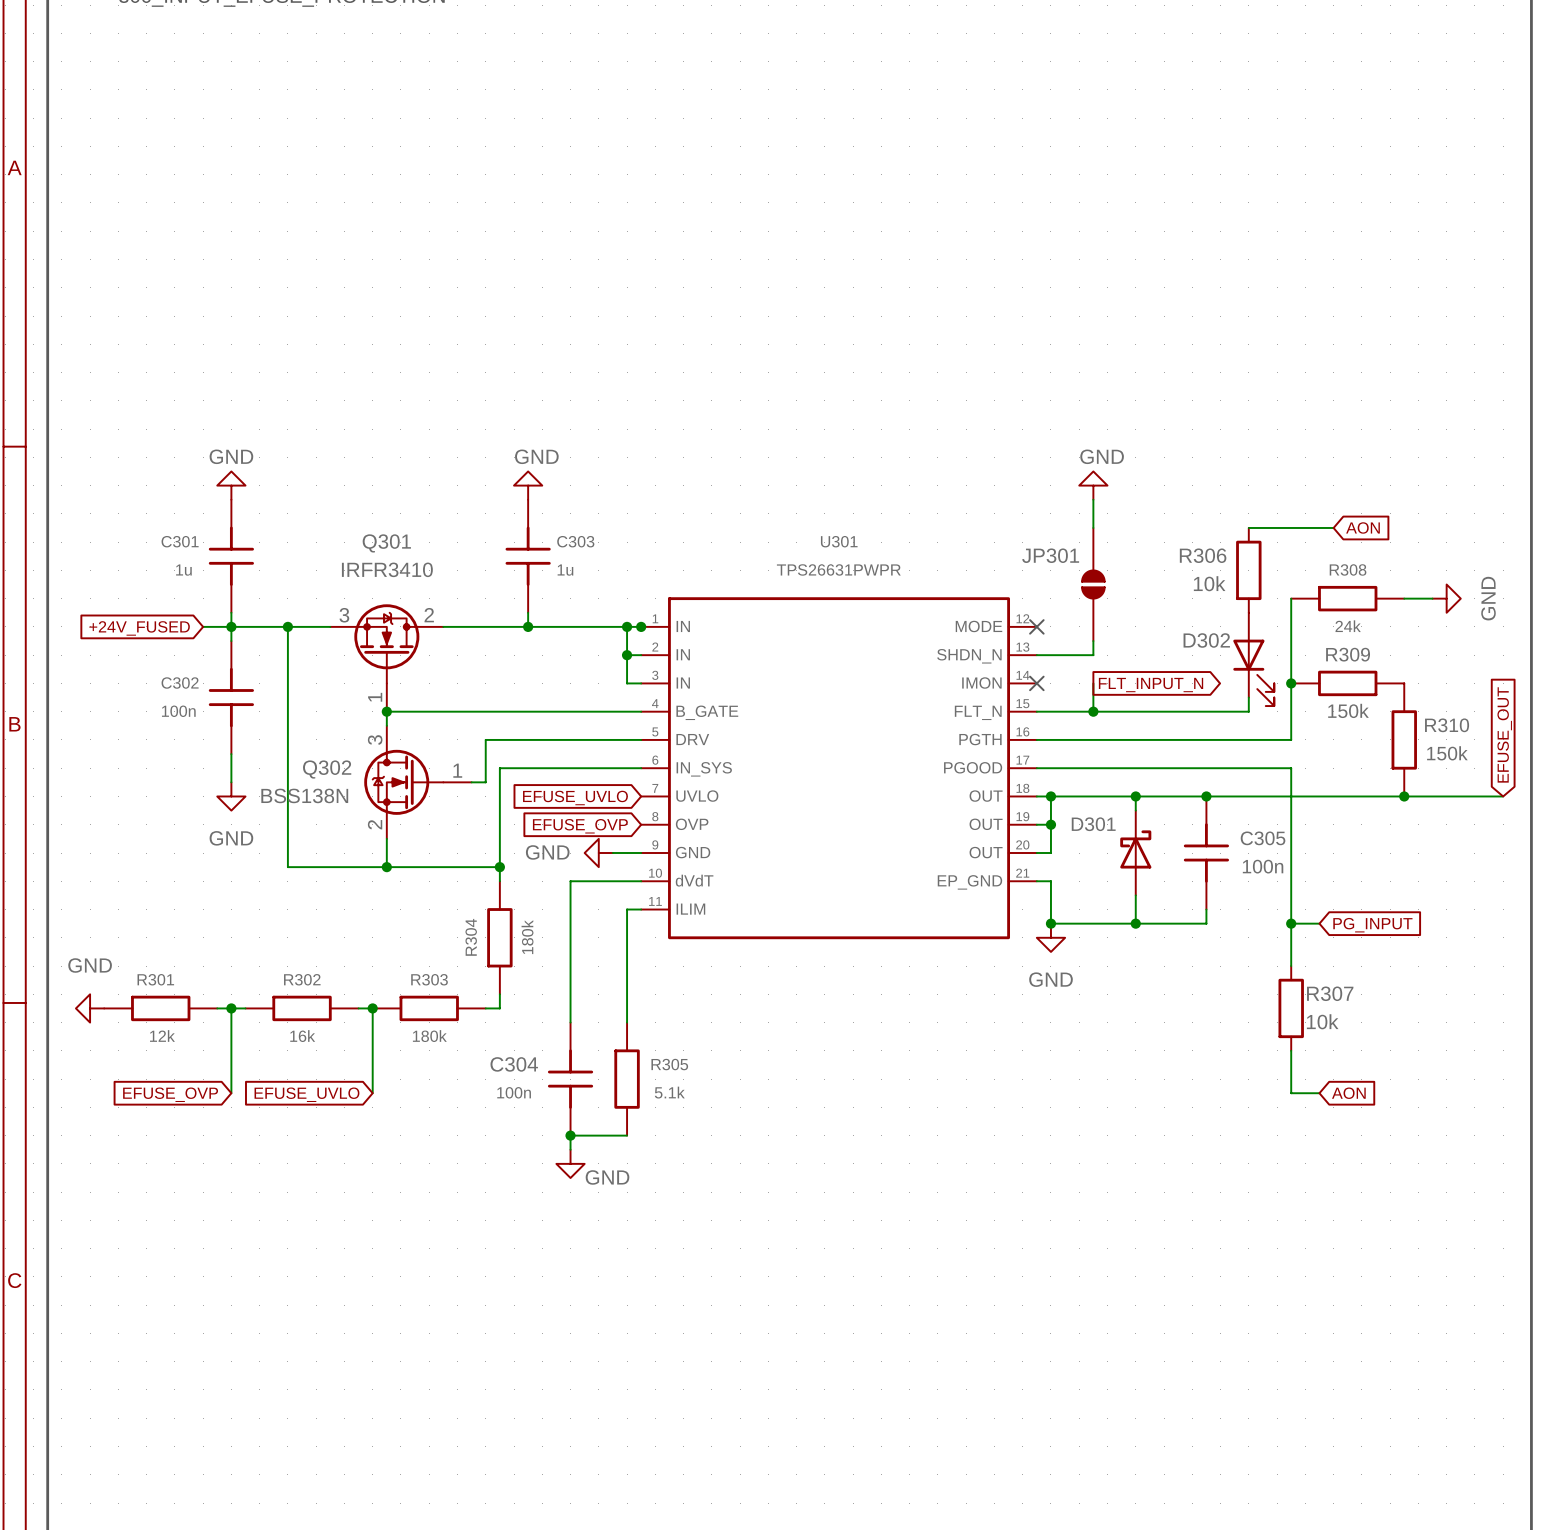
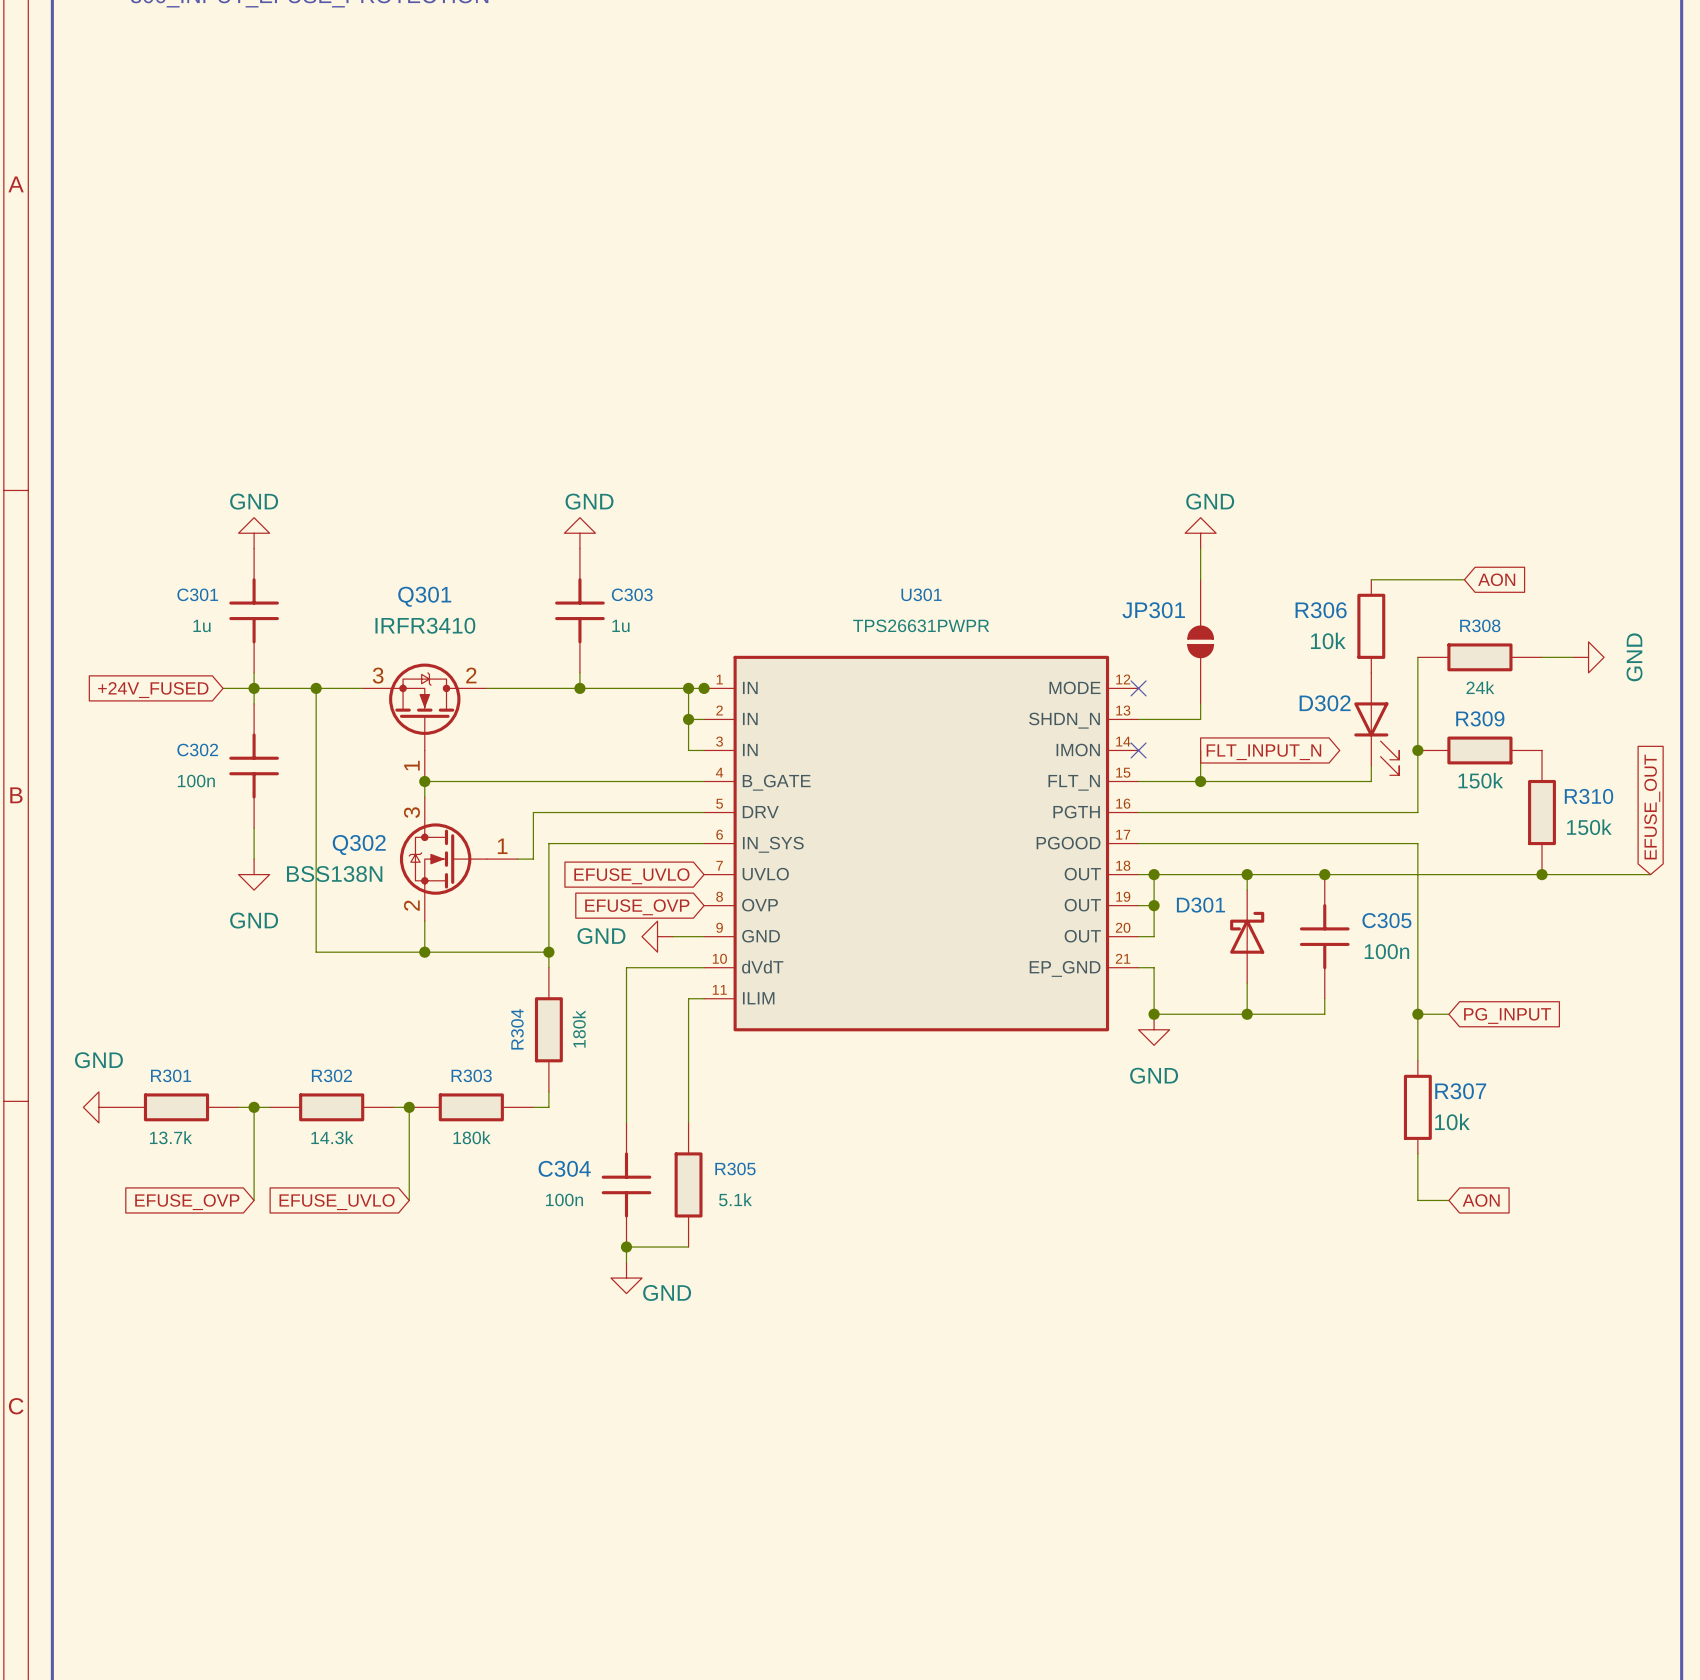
R301 value: 12k (162, 1035) -> 13.7k (170, 1137)
R302 value: 16k (302, 1036) -> 14.3k (332, 1137)

